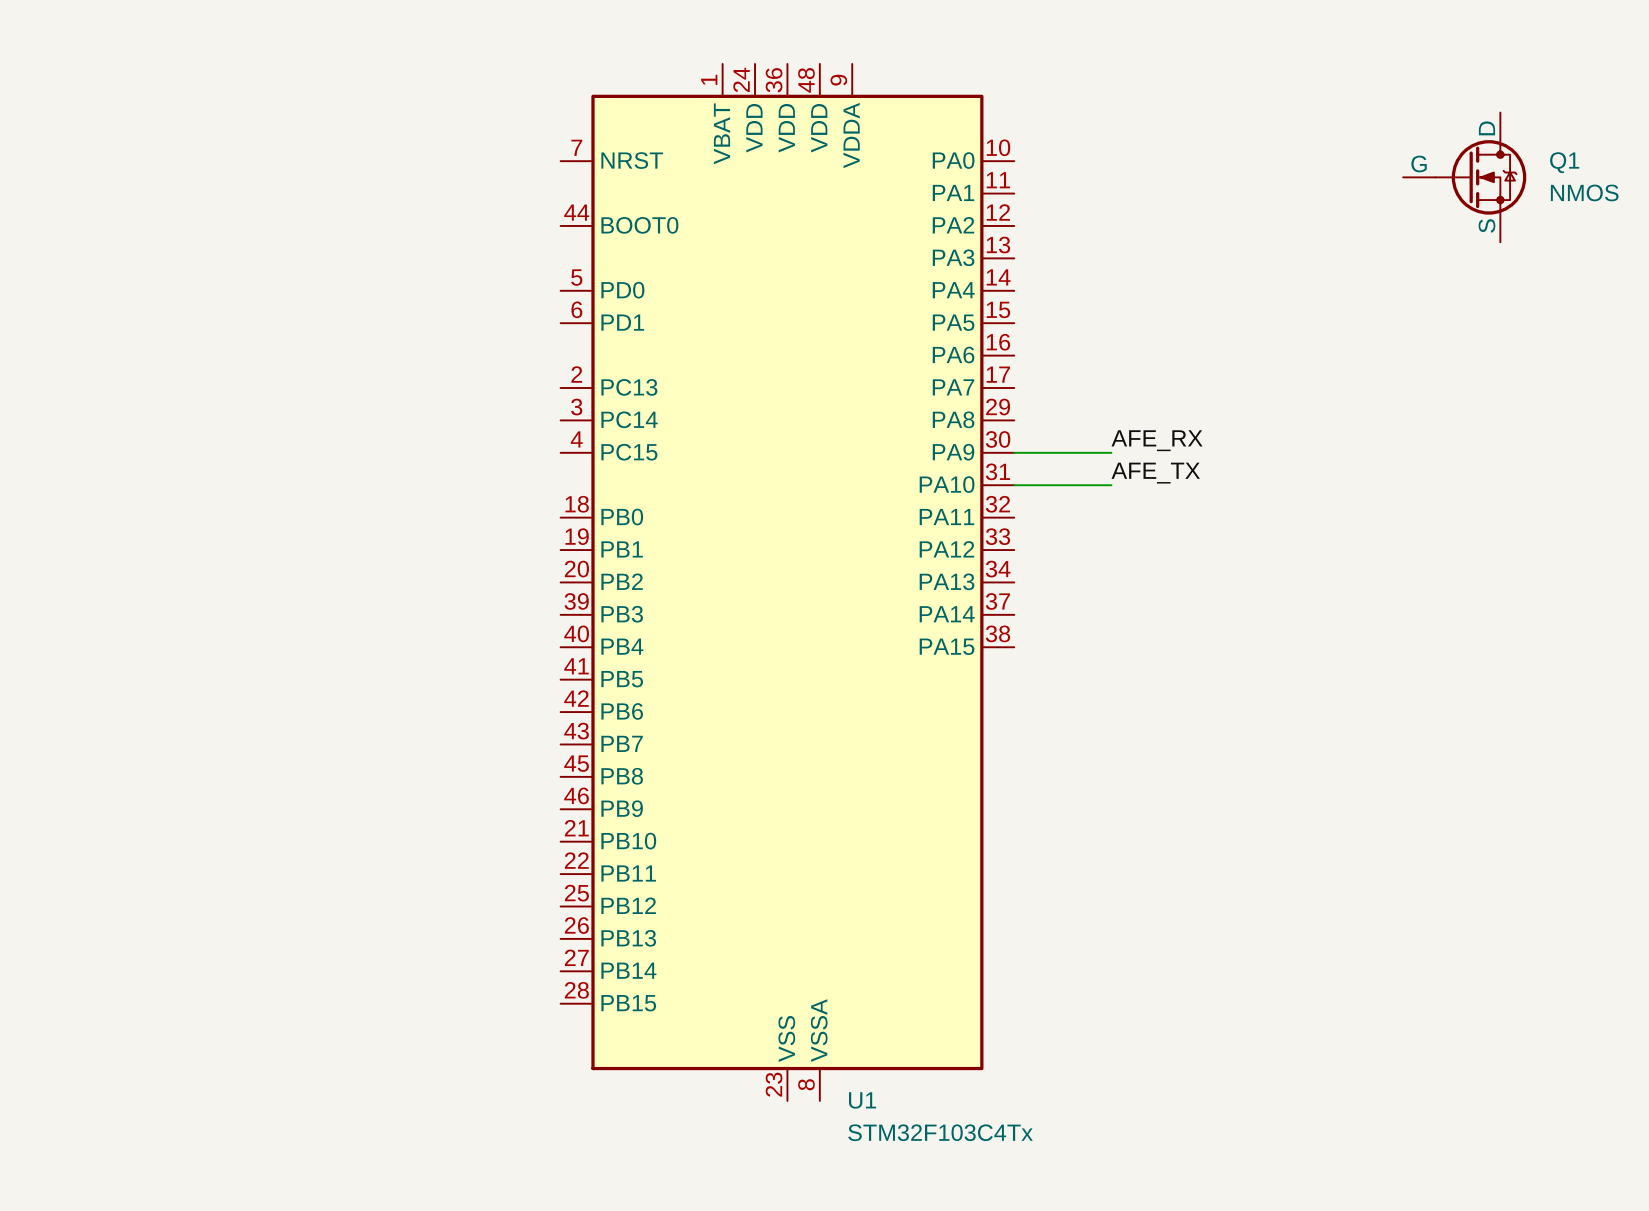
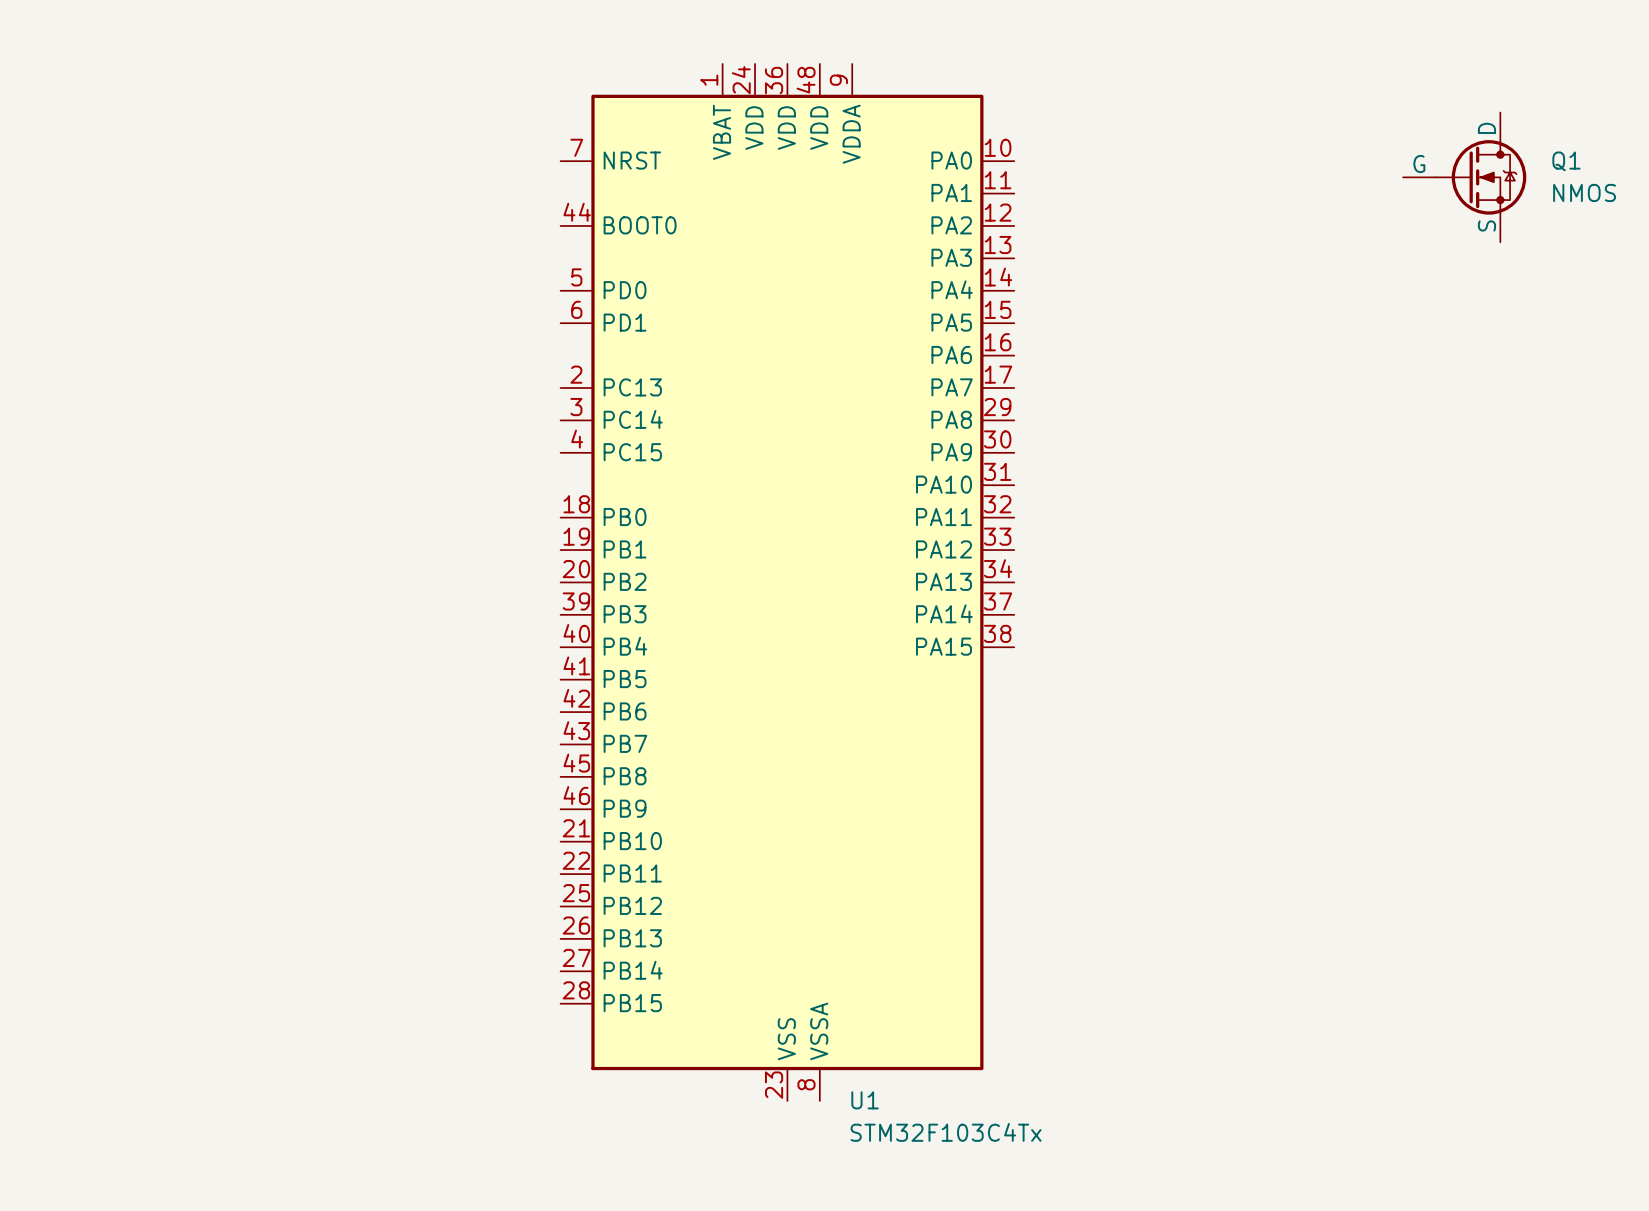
label: AFE_RX (1157, 440) -> none
wire: (1014, 452) (1111, 452) -> none
label: AFE_TX (1155, 473) -> none
wire: (1014, 485) (1111, 485) -> none

